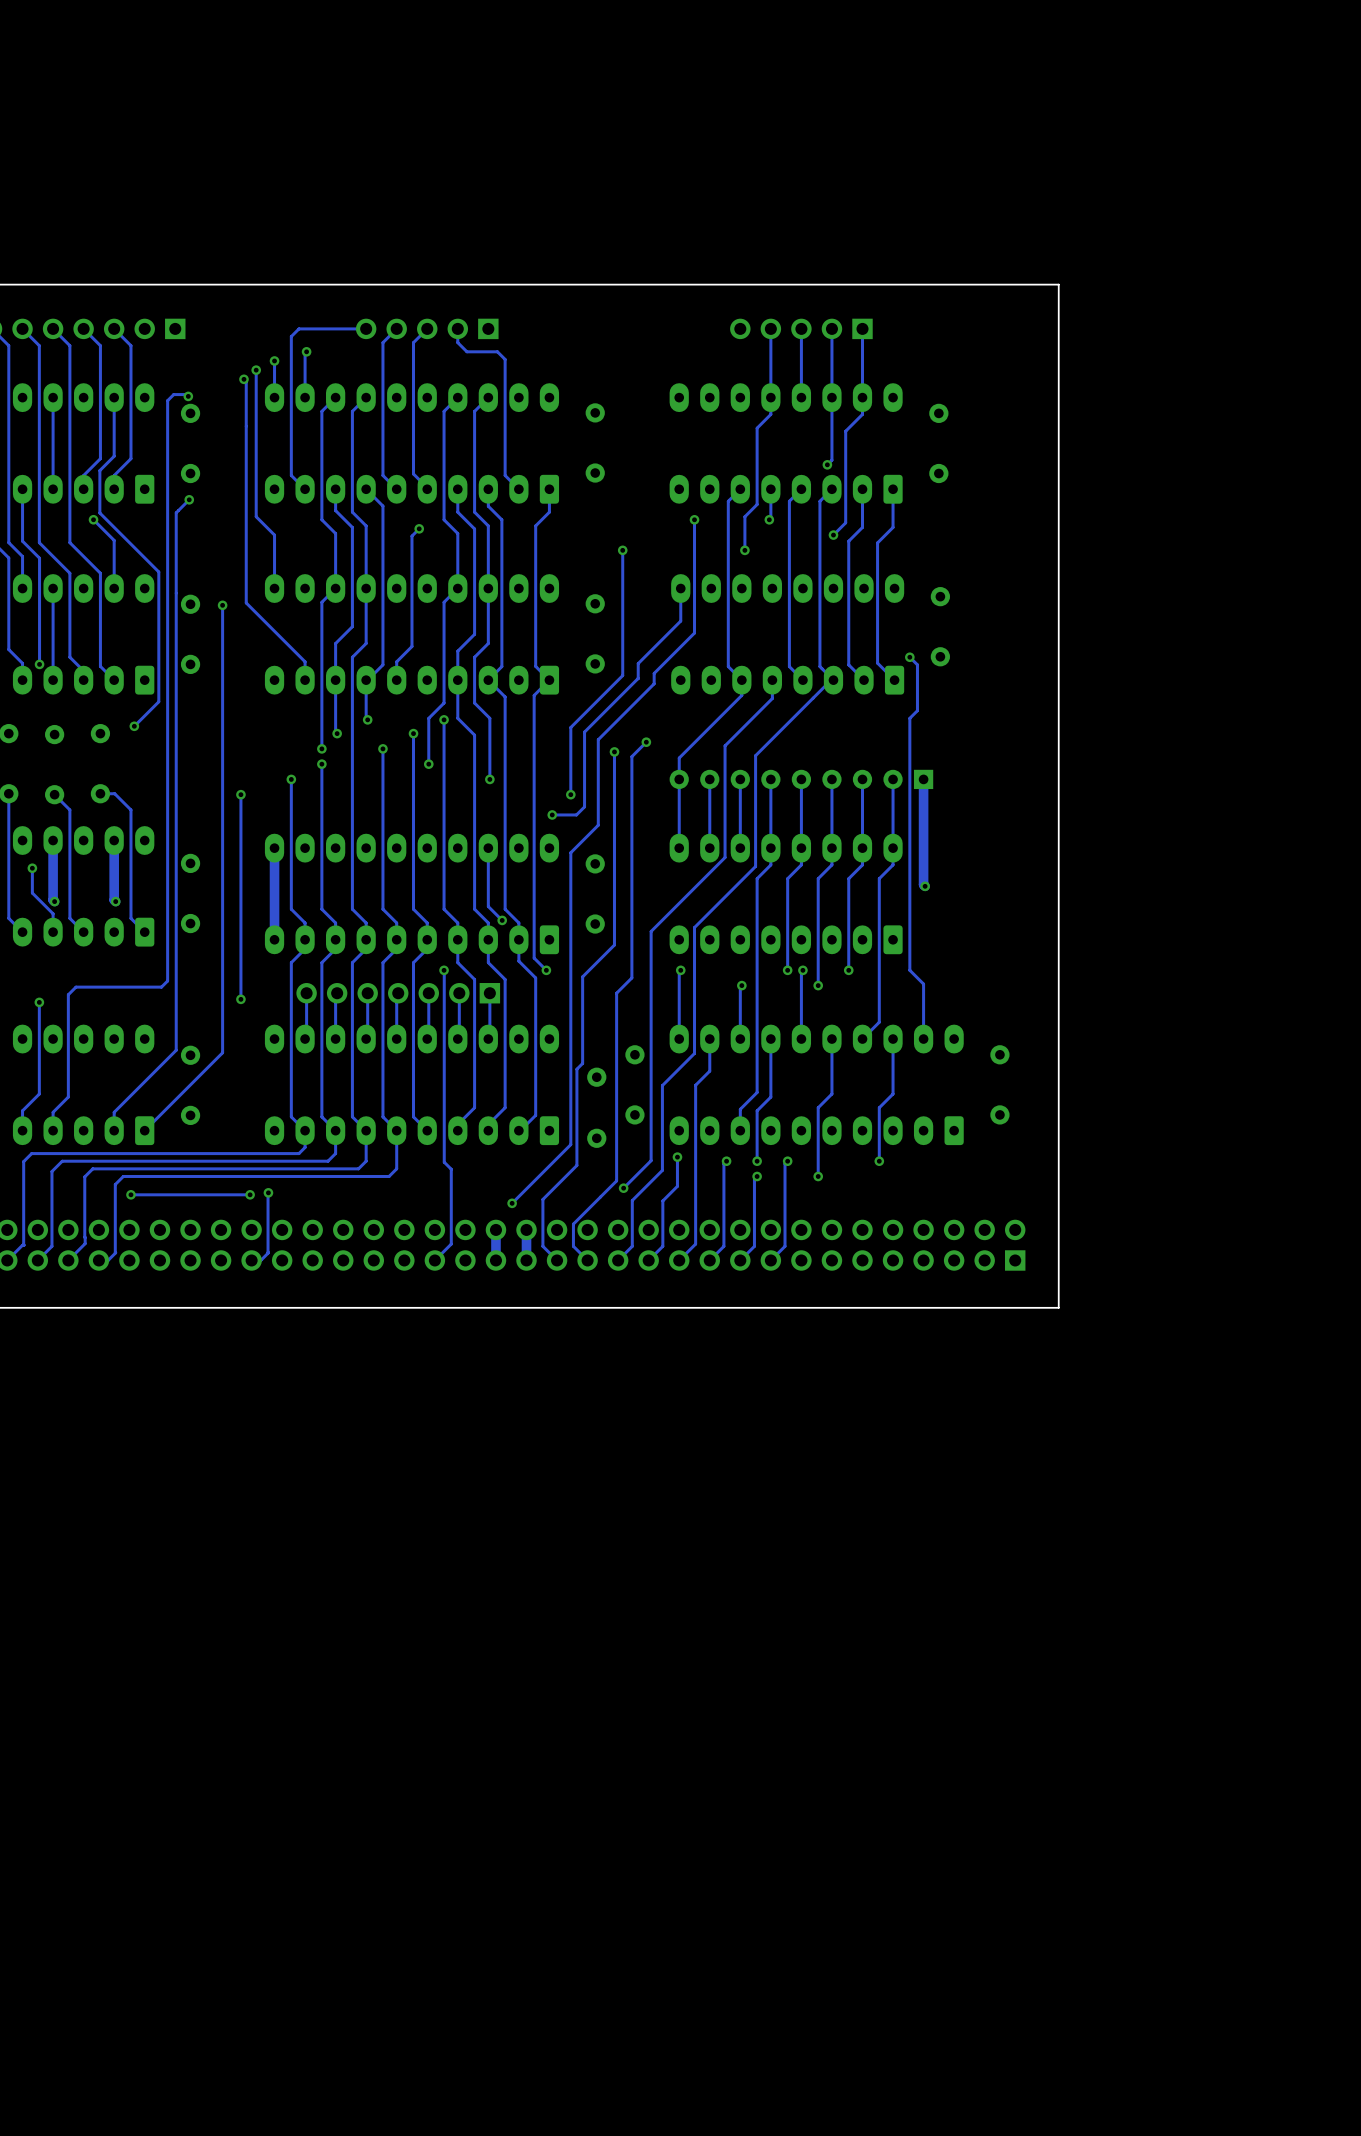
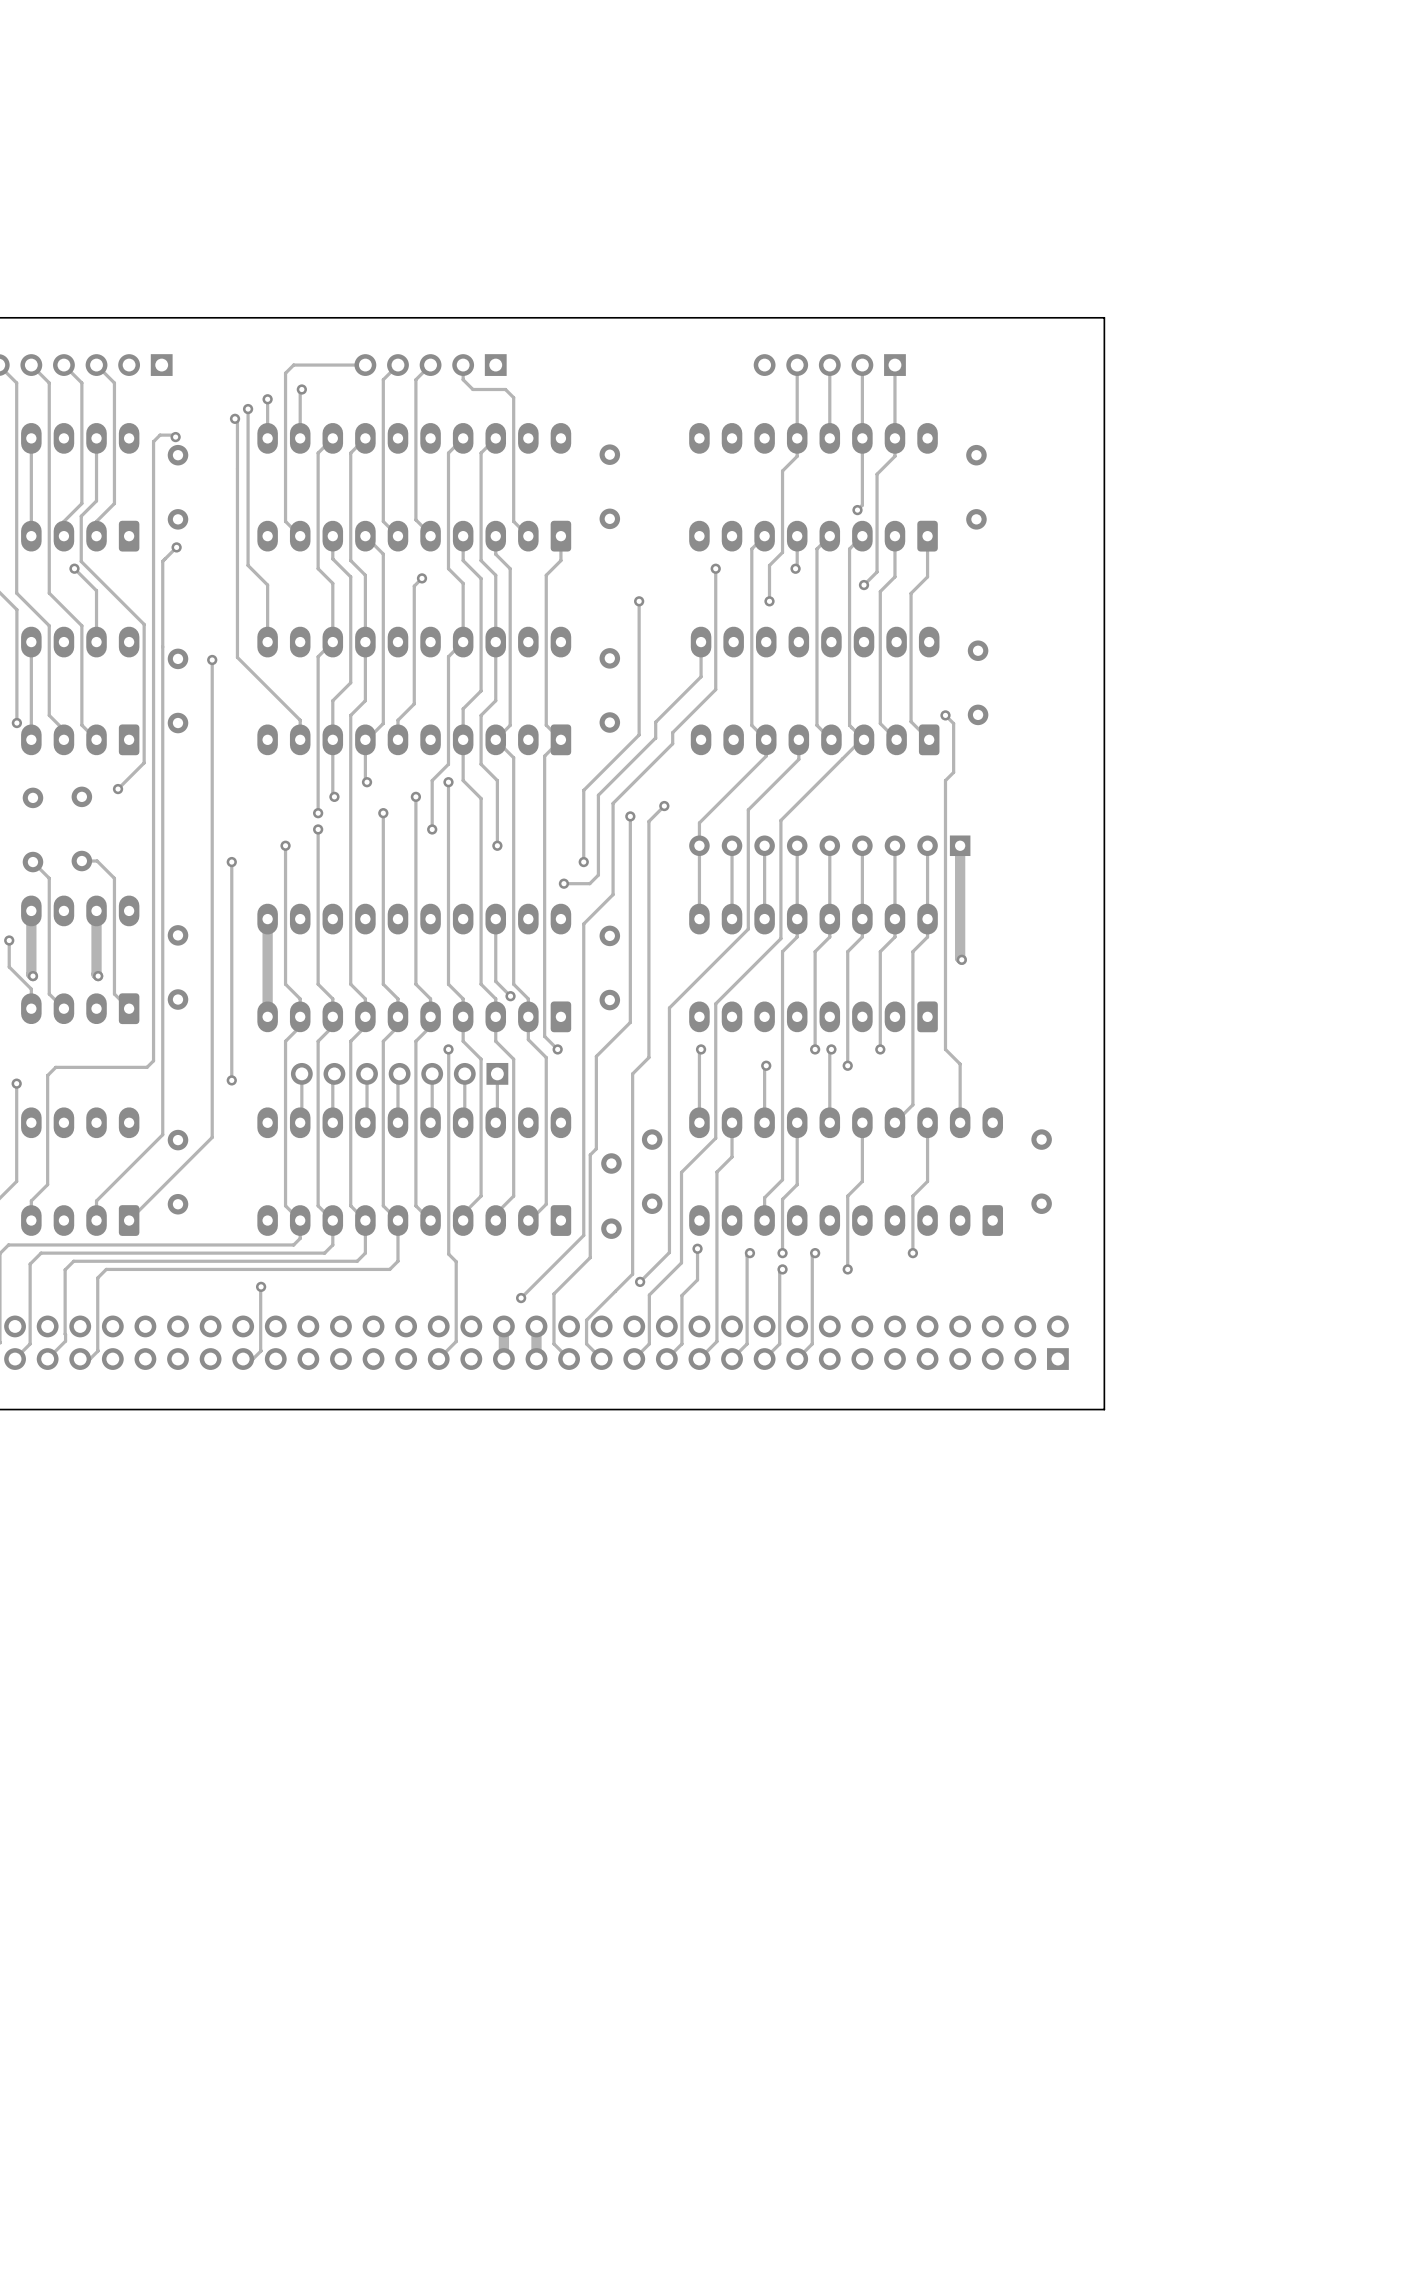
via: (130, 1194) -> none
track: (250, 1194) (130, 1194) -> none
via: (250, 1194) -> none

